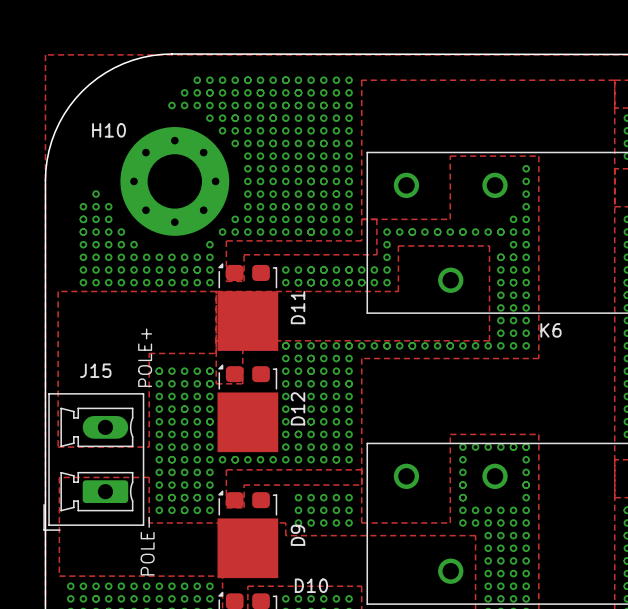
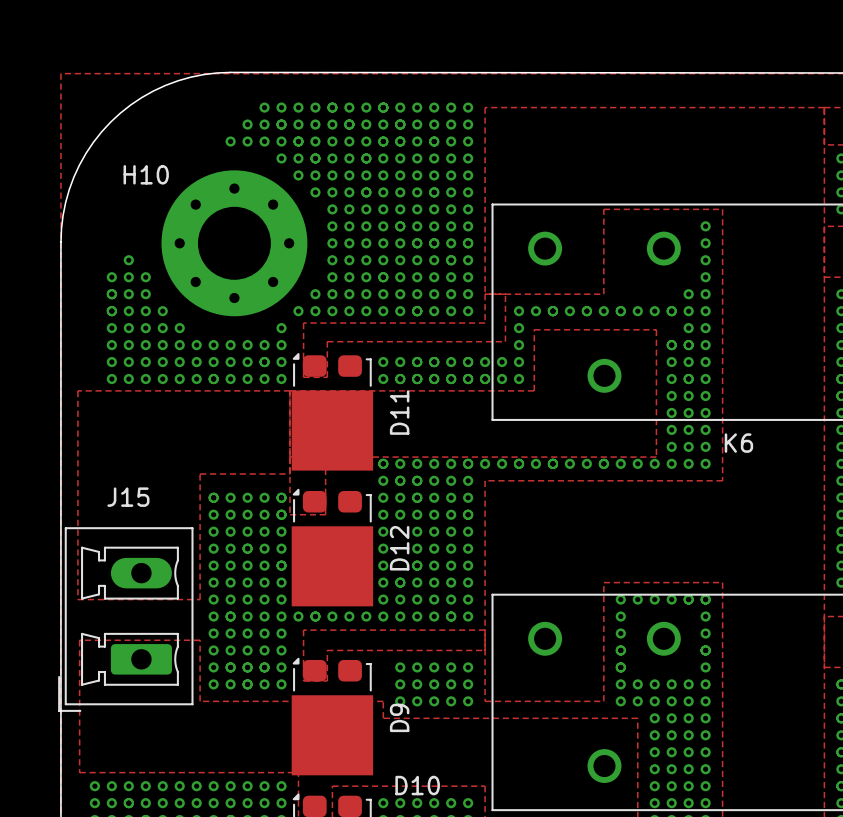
text: POLE+ (145, 357) -> none
text: POLE- (147, 546) -> none

